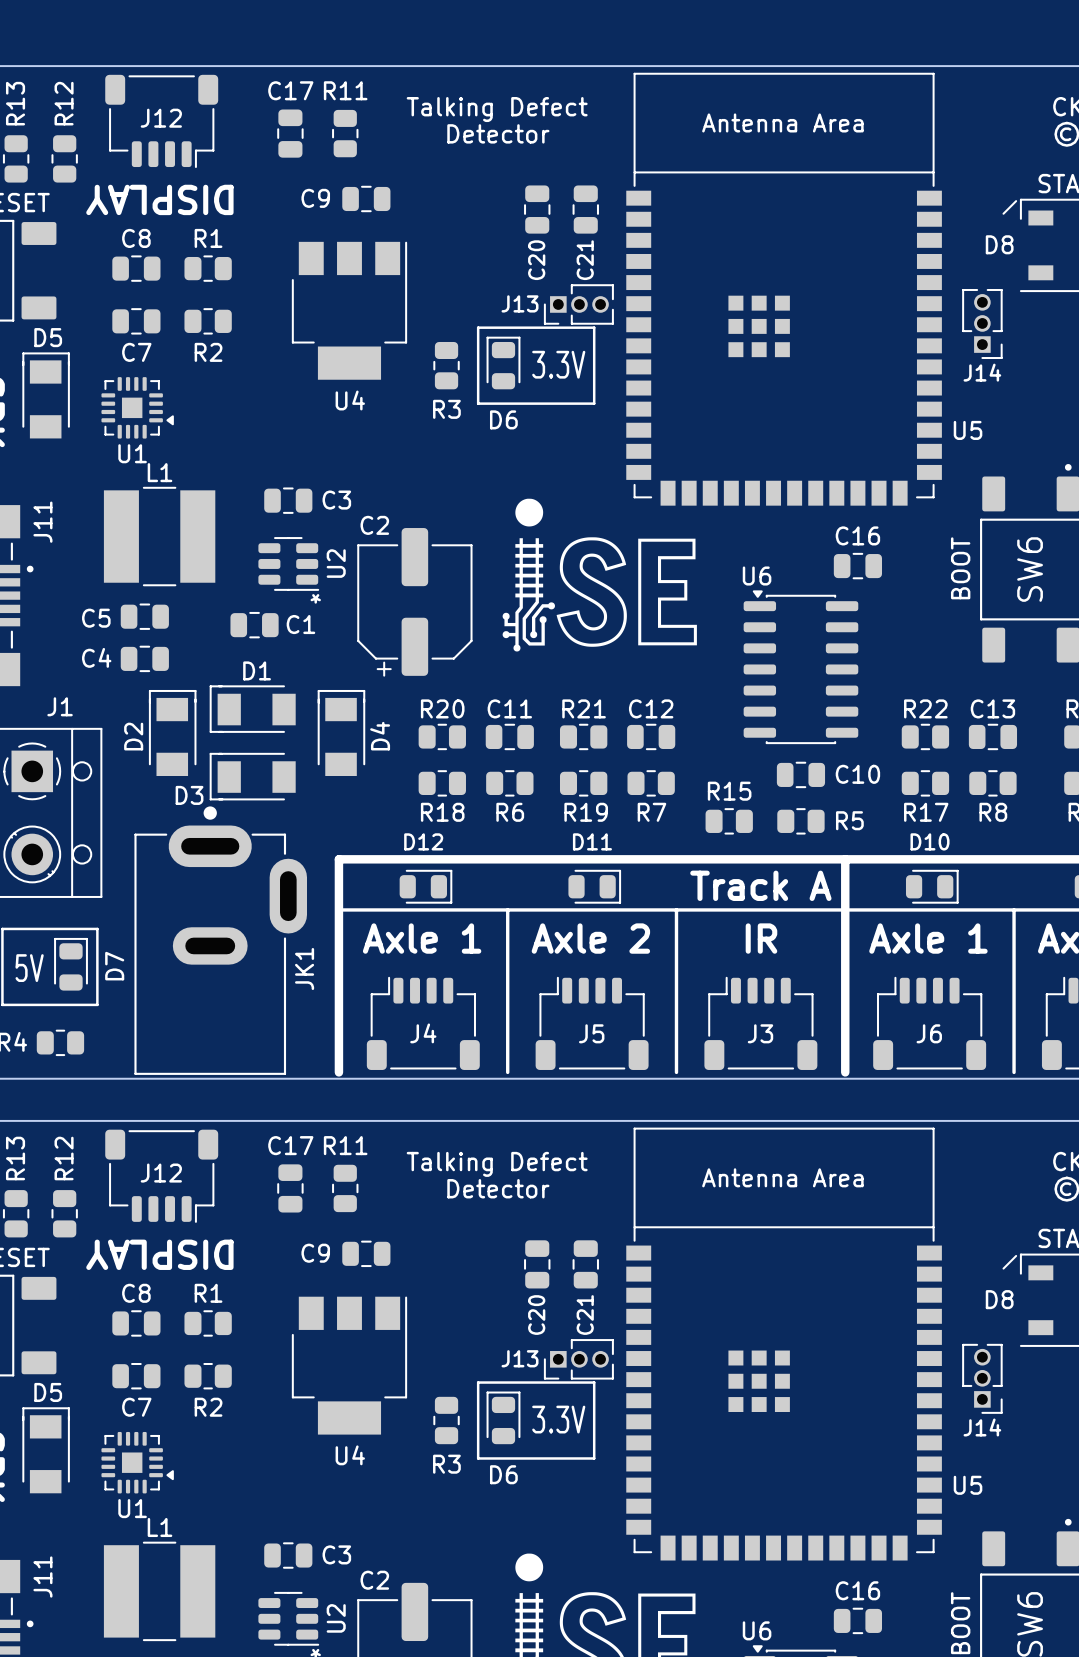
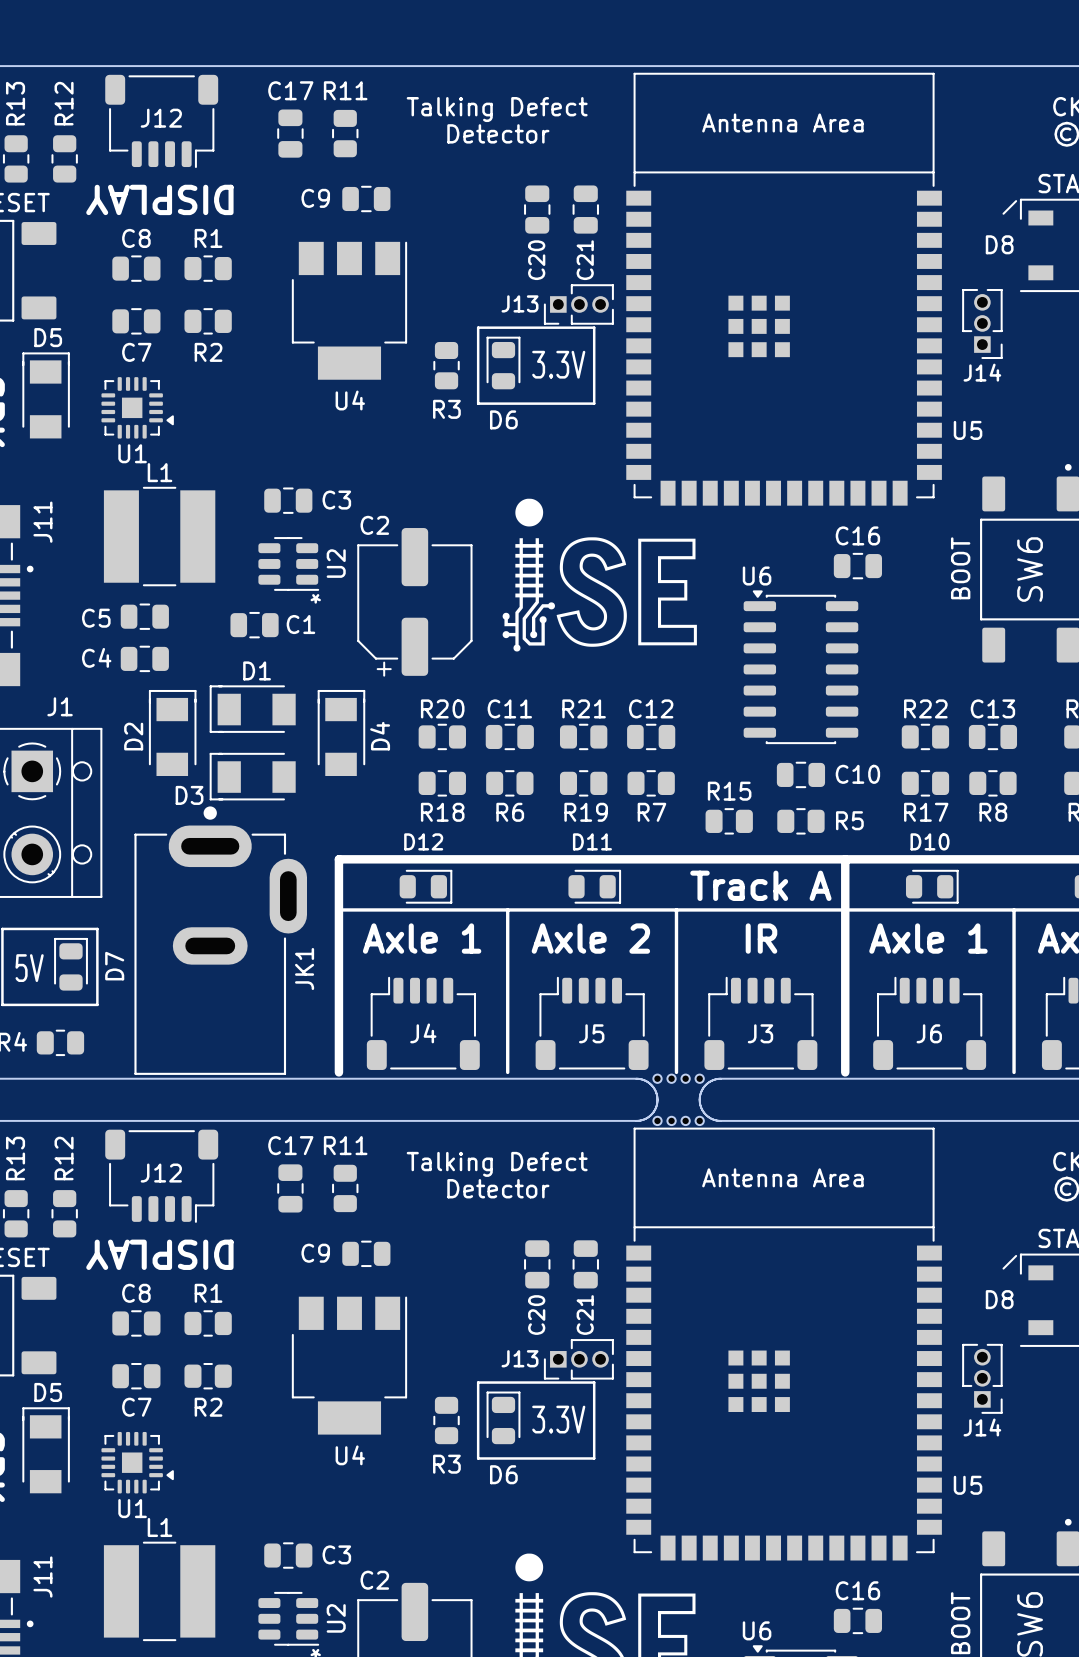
board edge: (636, 1078) (720, 1078) -> (636, 1078) (644, 1080) (651, 1084) (655, 1091) (657, 1099) (655, 1107) (651, 1114) (644, 1119) (636, 1120)
part: none -> (657, 1078)
part: none -> (671, 1078)
part: none -> (685, 1078)
part: none -> (699, 1078)
board edge: (636, 1120) (720, 1120) -> (720, 1078) (712, 1080) (705, 1084) (701, 1091) (699, 1099) (701, 1107) (705, 1114) (712, 1119) (720, 1120)
part: none -> (657, 1120)
part: none -> (671, 1120)
part: none -> (685, 1120)
part: none -> (699, 1120)

